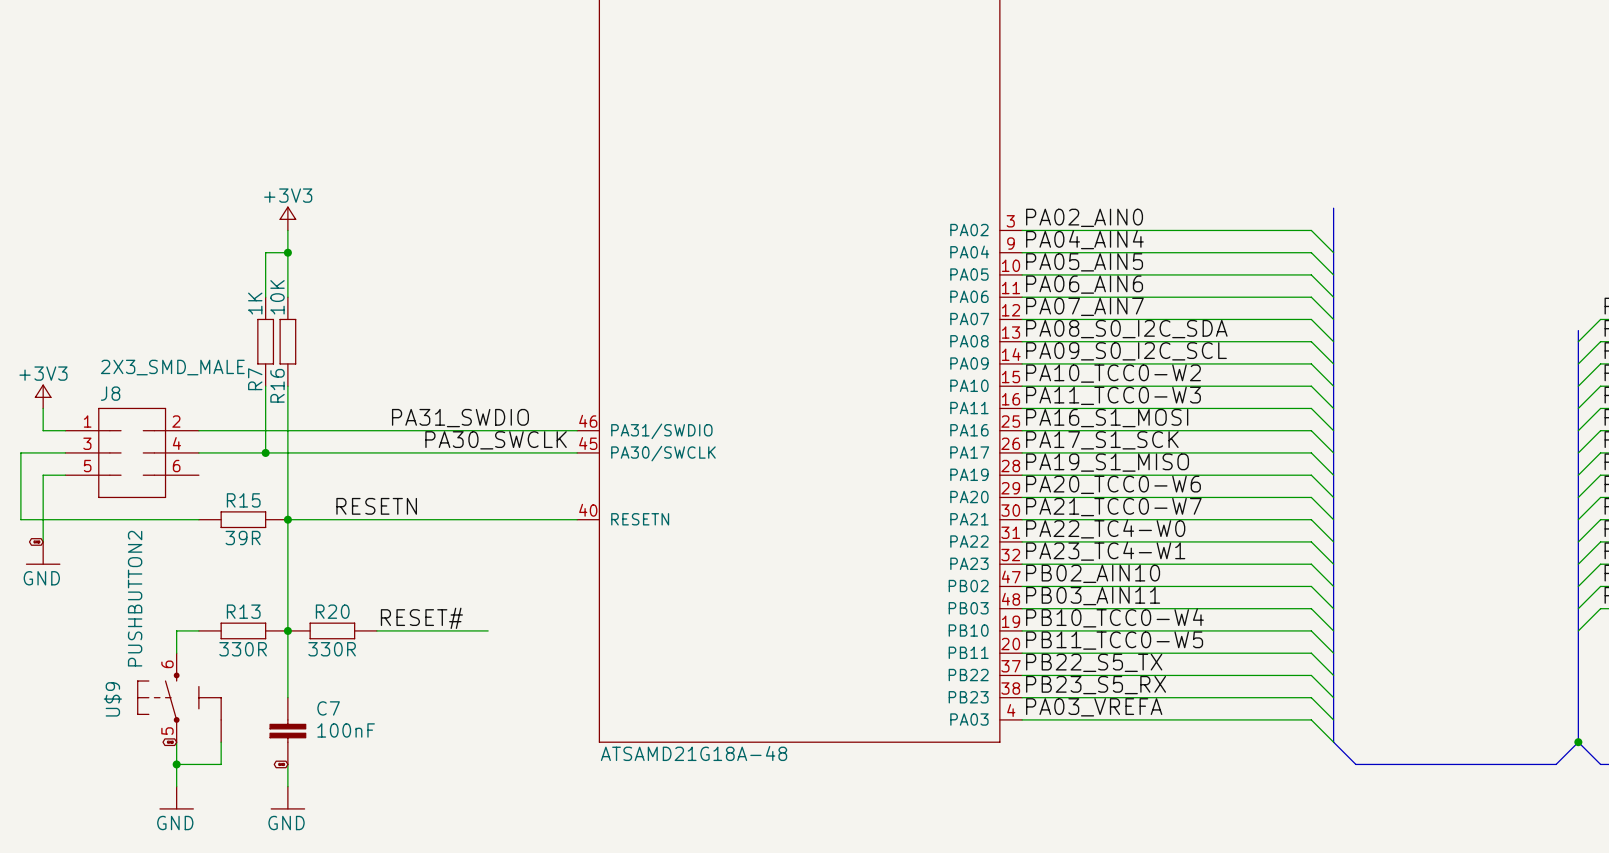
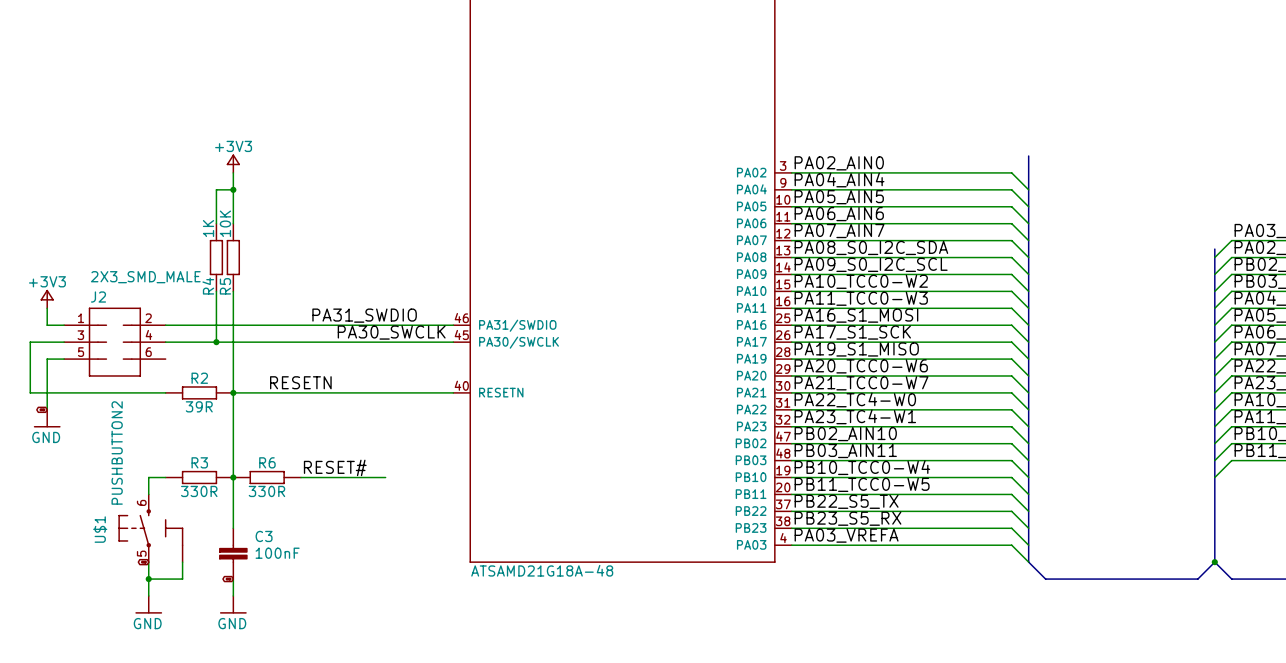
R7 name: R7 (255, 379) -> R4 (208, 286)
R16 name: R16 (277, 385) -> R5 (225, 286)
J8 name: J8 (110, 393) -> J2 (98, 297)
R15 name: R15 (243, 500) -> R2 (199, 378)
R13 name: R13 (243, 611) -> R3 (199, 462)
R20 name: R20 (332, 611) -> R6 (267, 462)
U$9 name: U$9 (112, 699) -> U$1 (100, 529)
C7 name: C7 (328, 708) -> C3 (264, 536)

